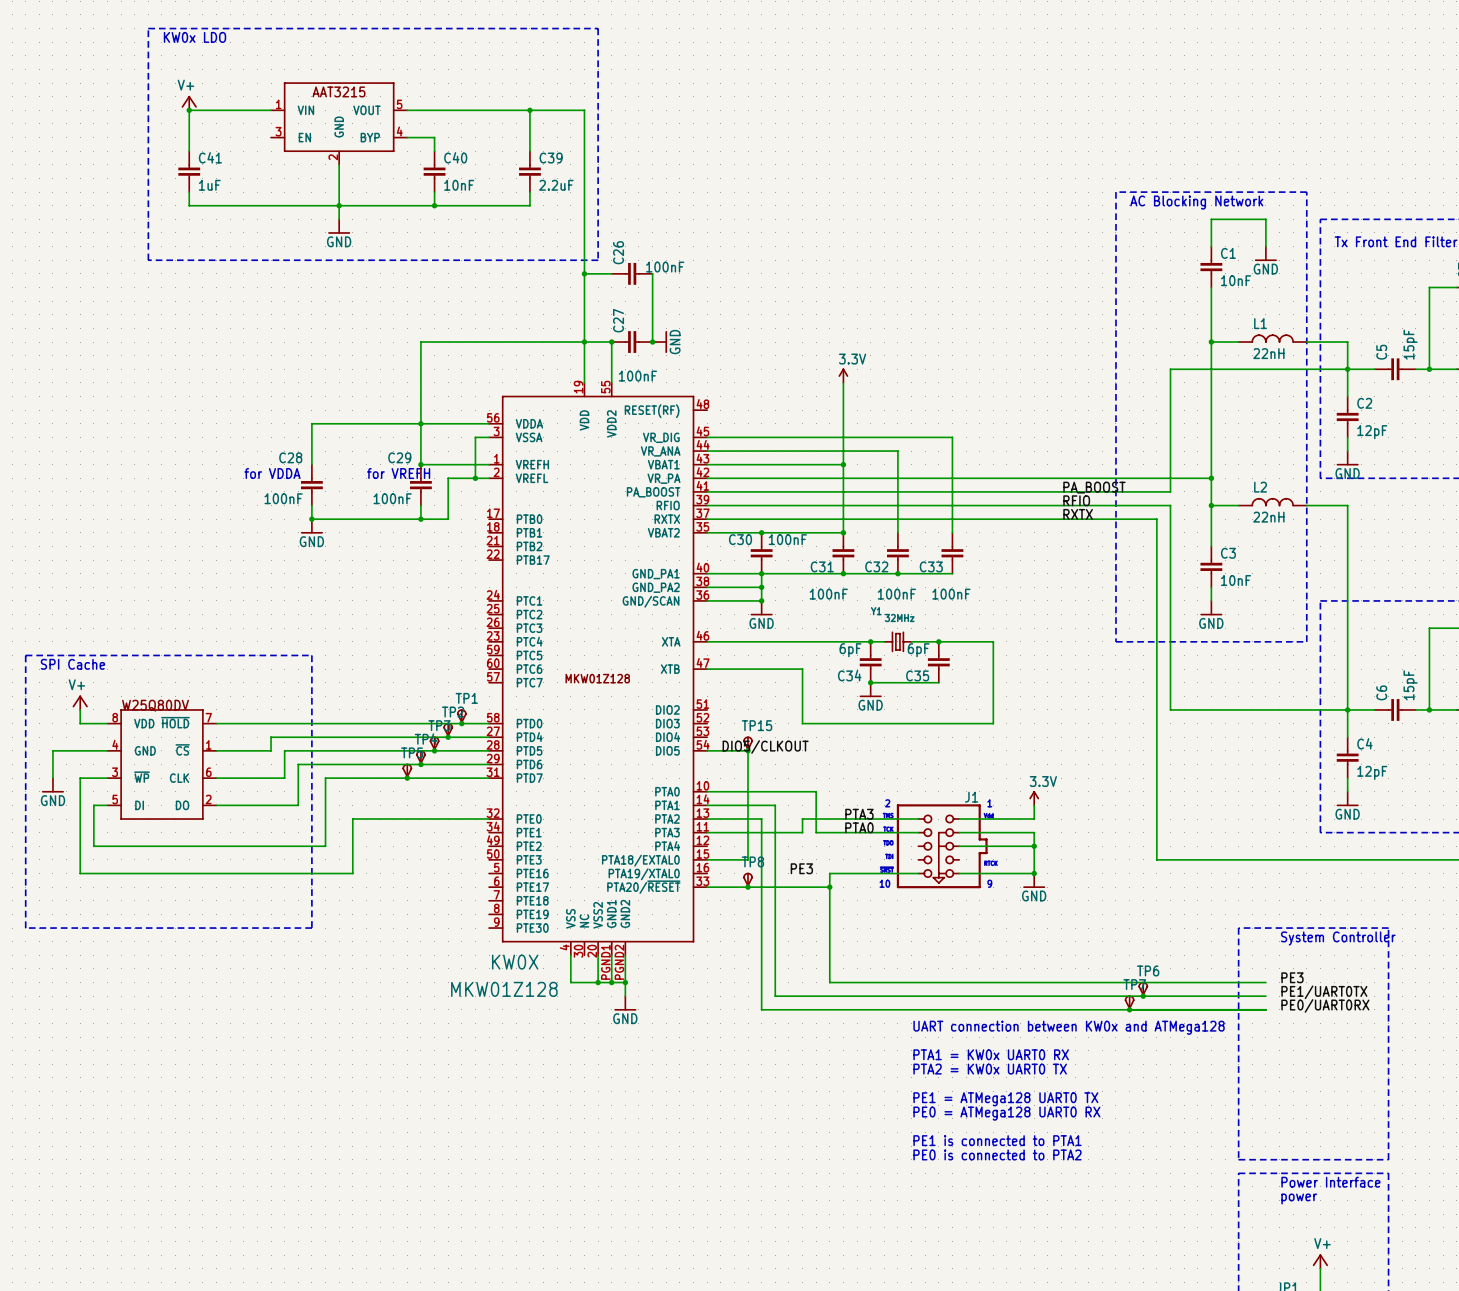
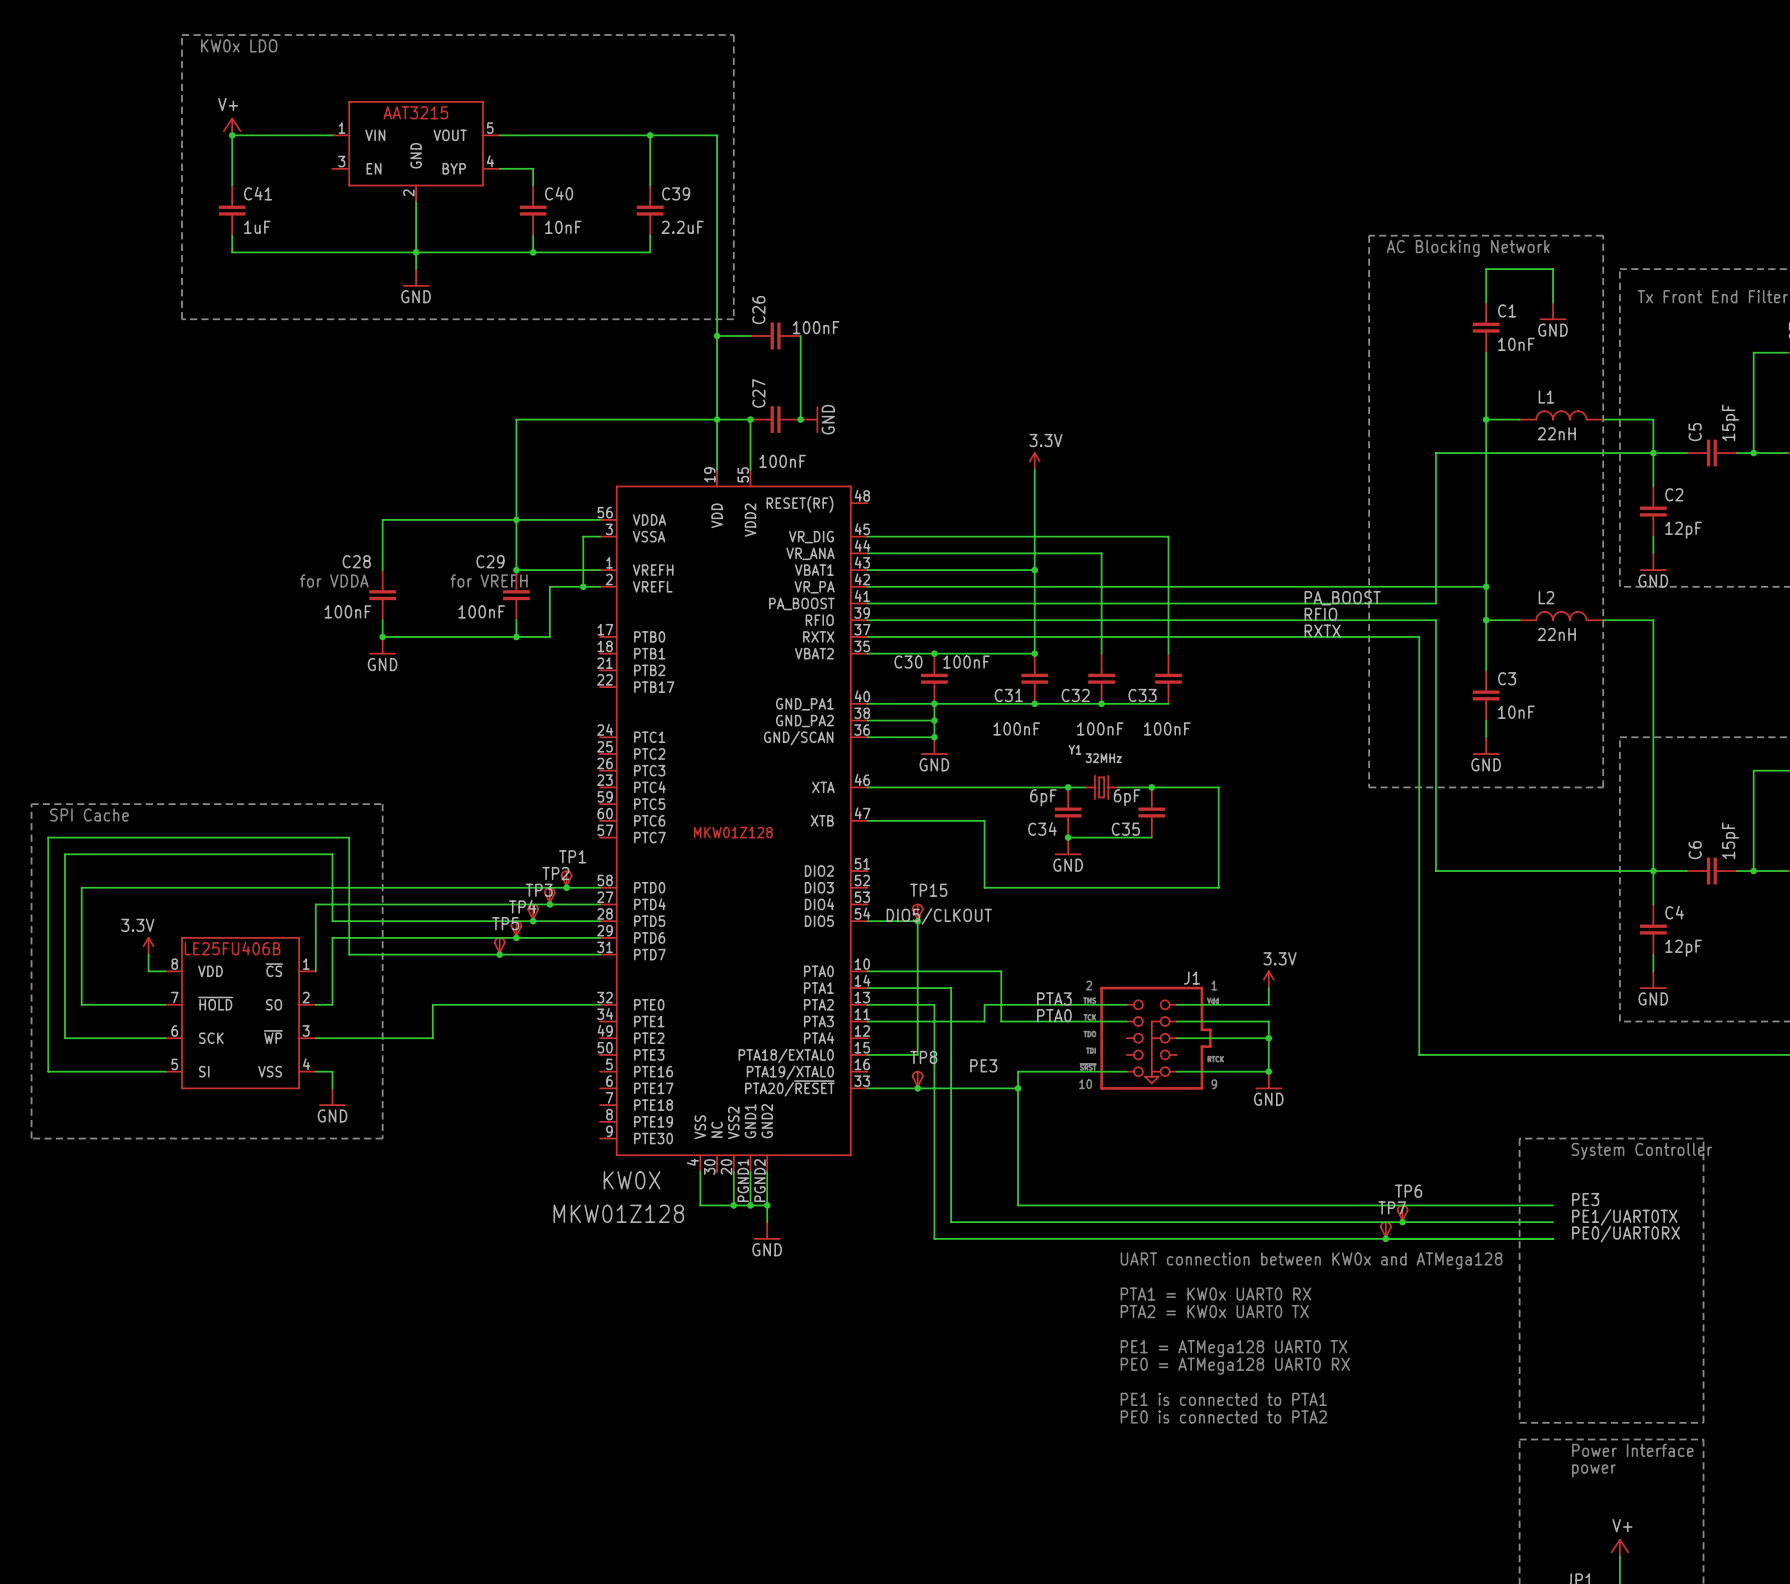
power symbol: V+ (80, 702) -> none
wire: (80, 709) (80, 723) -> (165, 1004) (81, 1004) (81, 887) (98, 887)
wire: none -> (131, 887) (265, 887)
wire: (52, 750) (107, 750) -> (64, 921) (64, 854) (332, 854) (332, 904) (315, 904) (315, 971)
wire: (216, 750) (271, 750) -> none
part: (161, 764) -> none
wire: (298, 764) (298, 805) (216, 805) -> (365, 937) (332, 937) (332, 1004) (315, 1004)
power symbol: none -> 3.3V (148, 945)
wire: (107, 778) (80, 778) (80, 873) -> (332, 921) (349, 921) (349, 837) (48, 837) (48, 1071) (98, 1071)
wire: none -> (148, 954) (148, 971) (165, 971)
wire: (216, 778) (284, 778) -> none
wire: (325, 778) (325, 846) -> (399, 954) (349, 954)
power symbol: GND (52, 785) -> none
wire: (107, 805) (93, 805) (93, 846) -> (64, 954) (64, 1038) (115, 1038)
part: none -> (240, 1013)
wire: (134, 846) (257, 846) -> none
wire: (352, 846) (352, 873) (271, 873) -> (432, 1038) (399, 1038)
wire: (134, 873) (257, 873) -> none
wire: none -> (332, 1071) (332, 1088)
power symbol: none -> GND (332, 1097)

